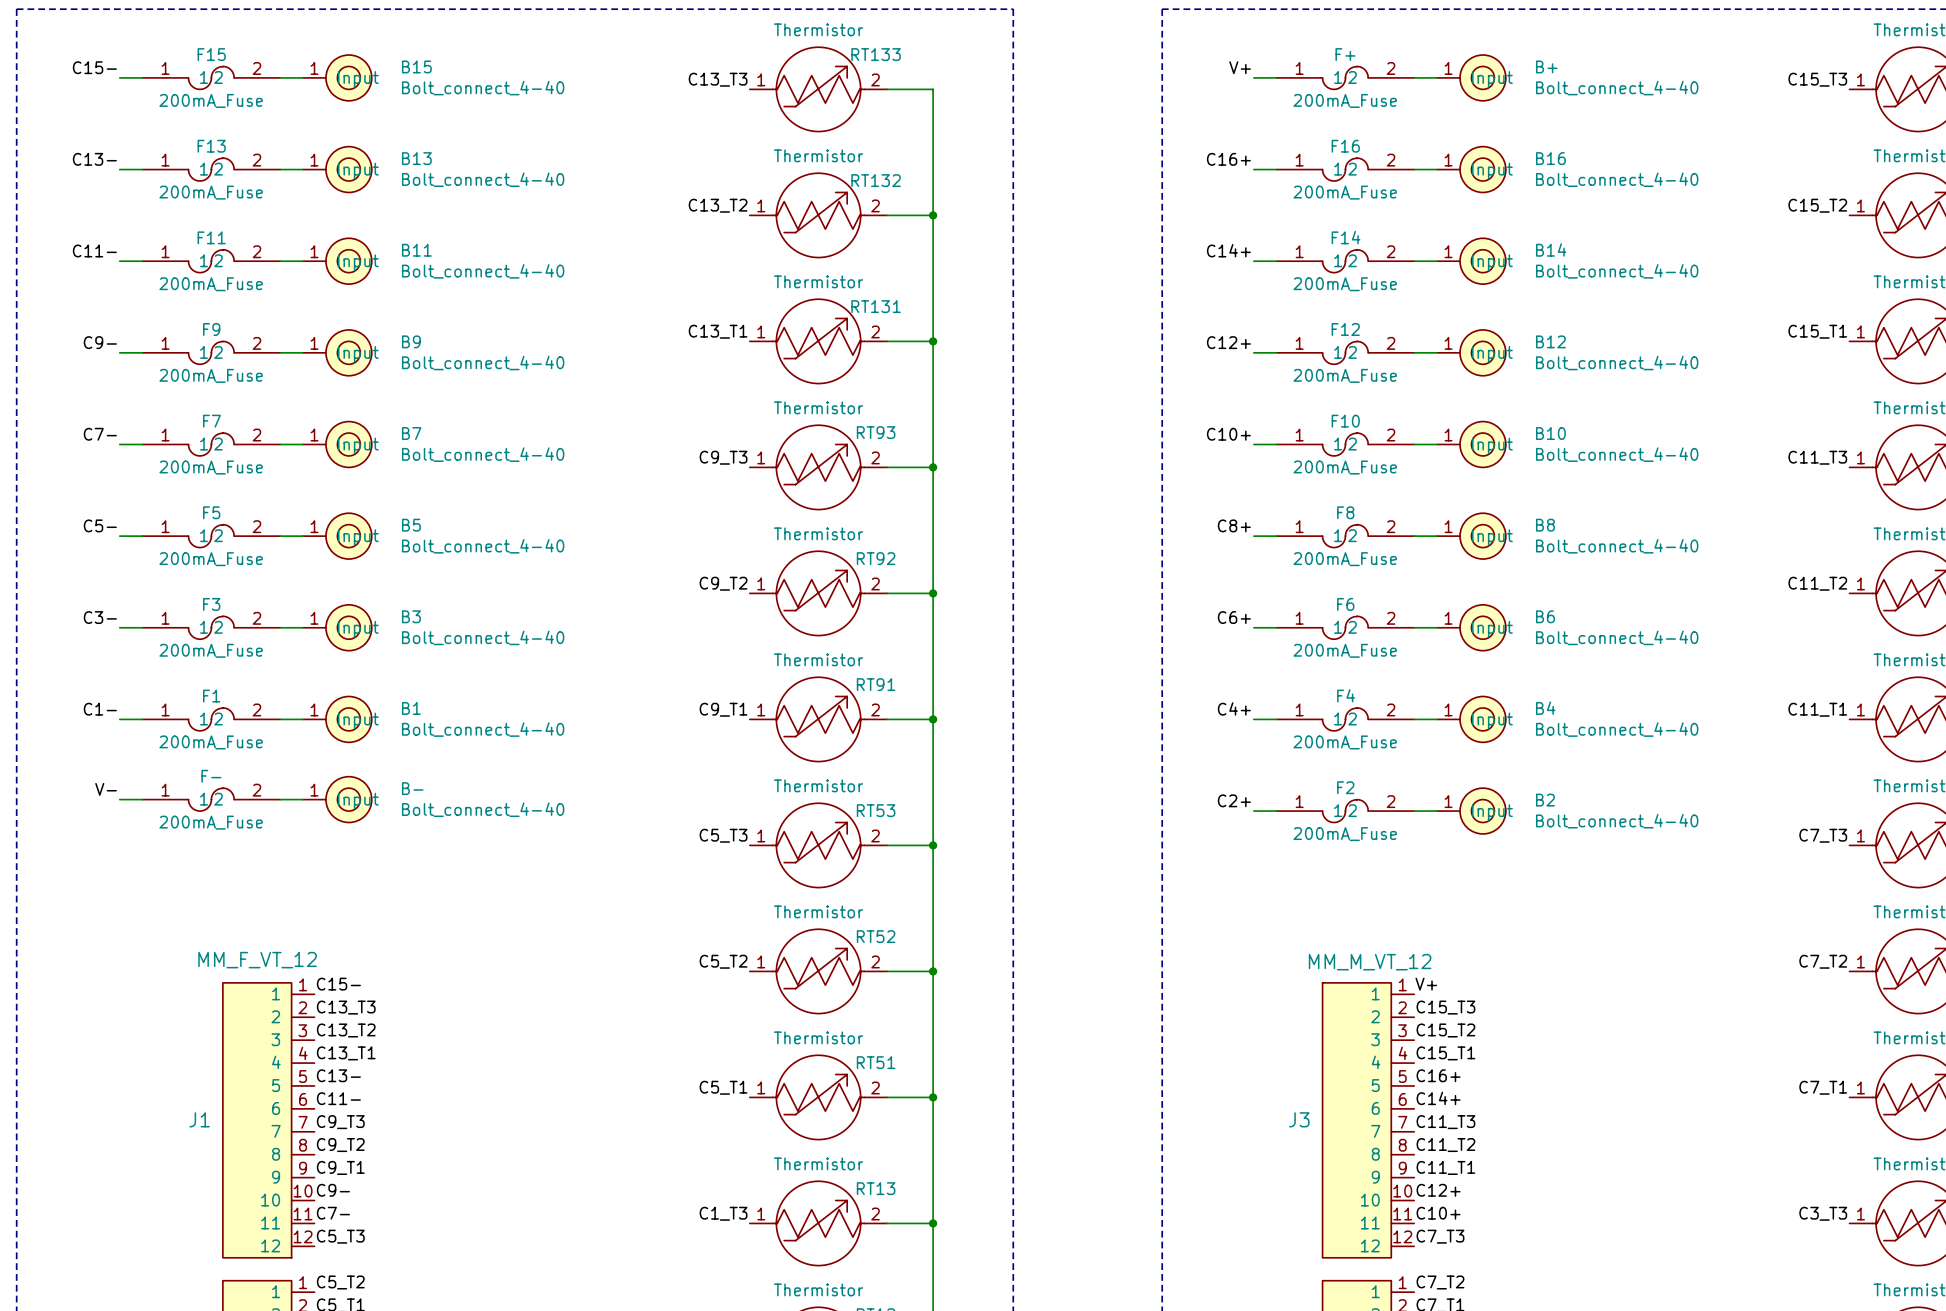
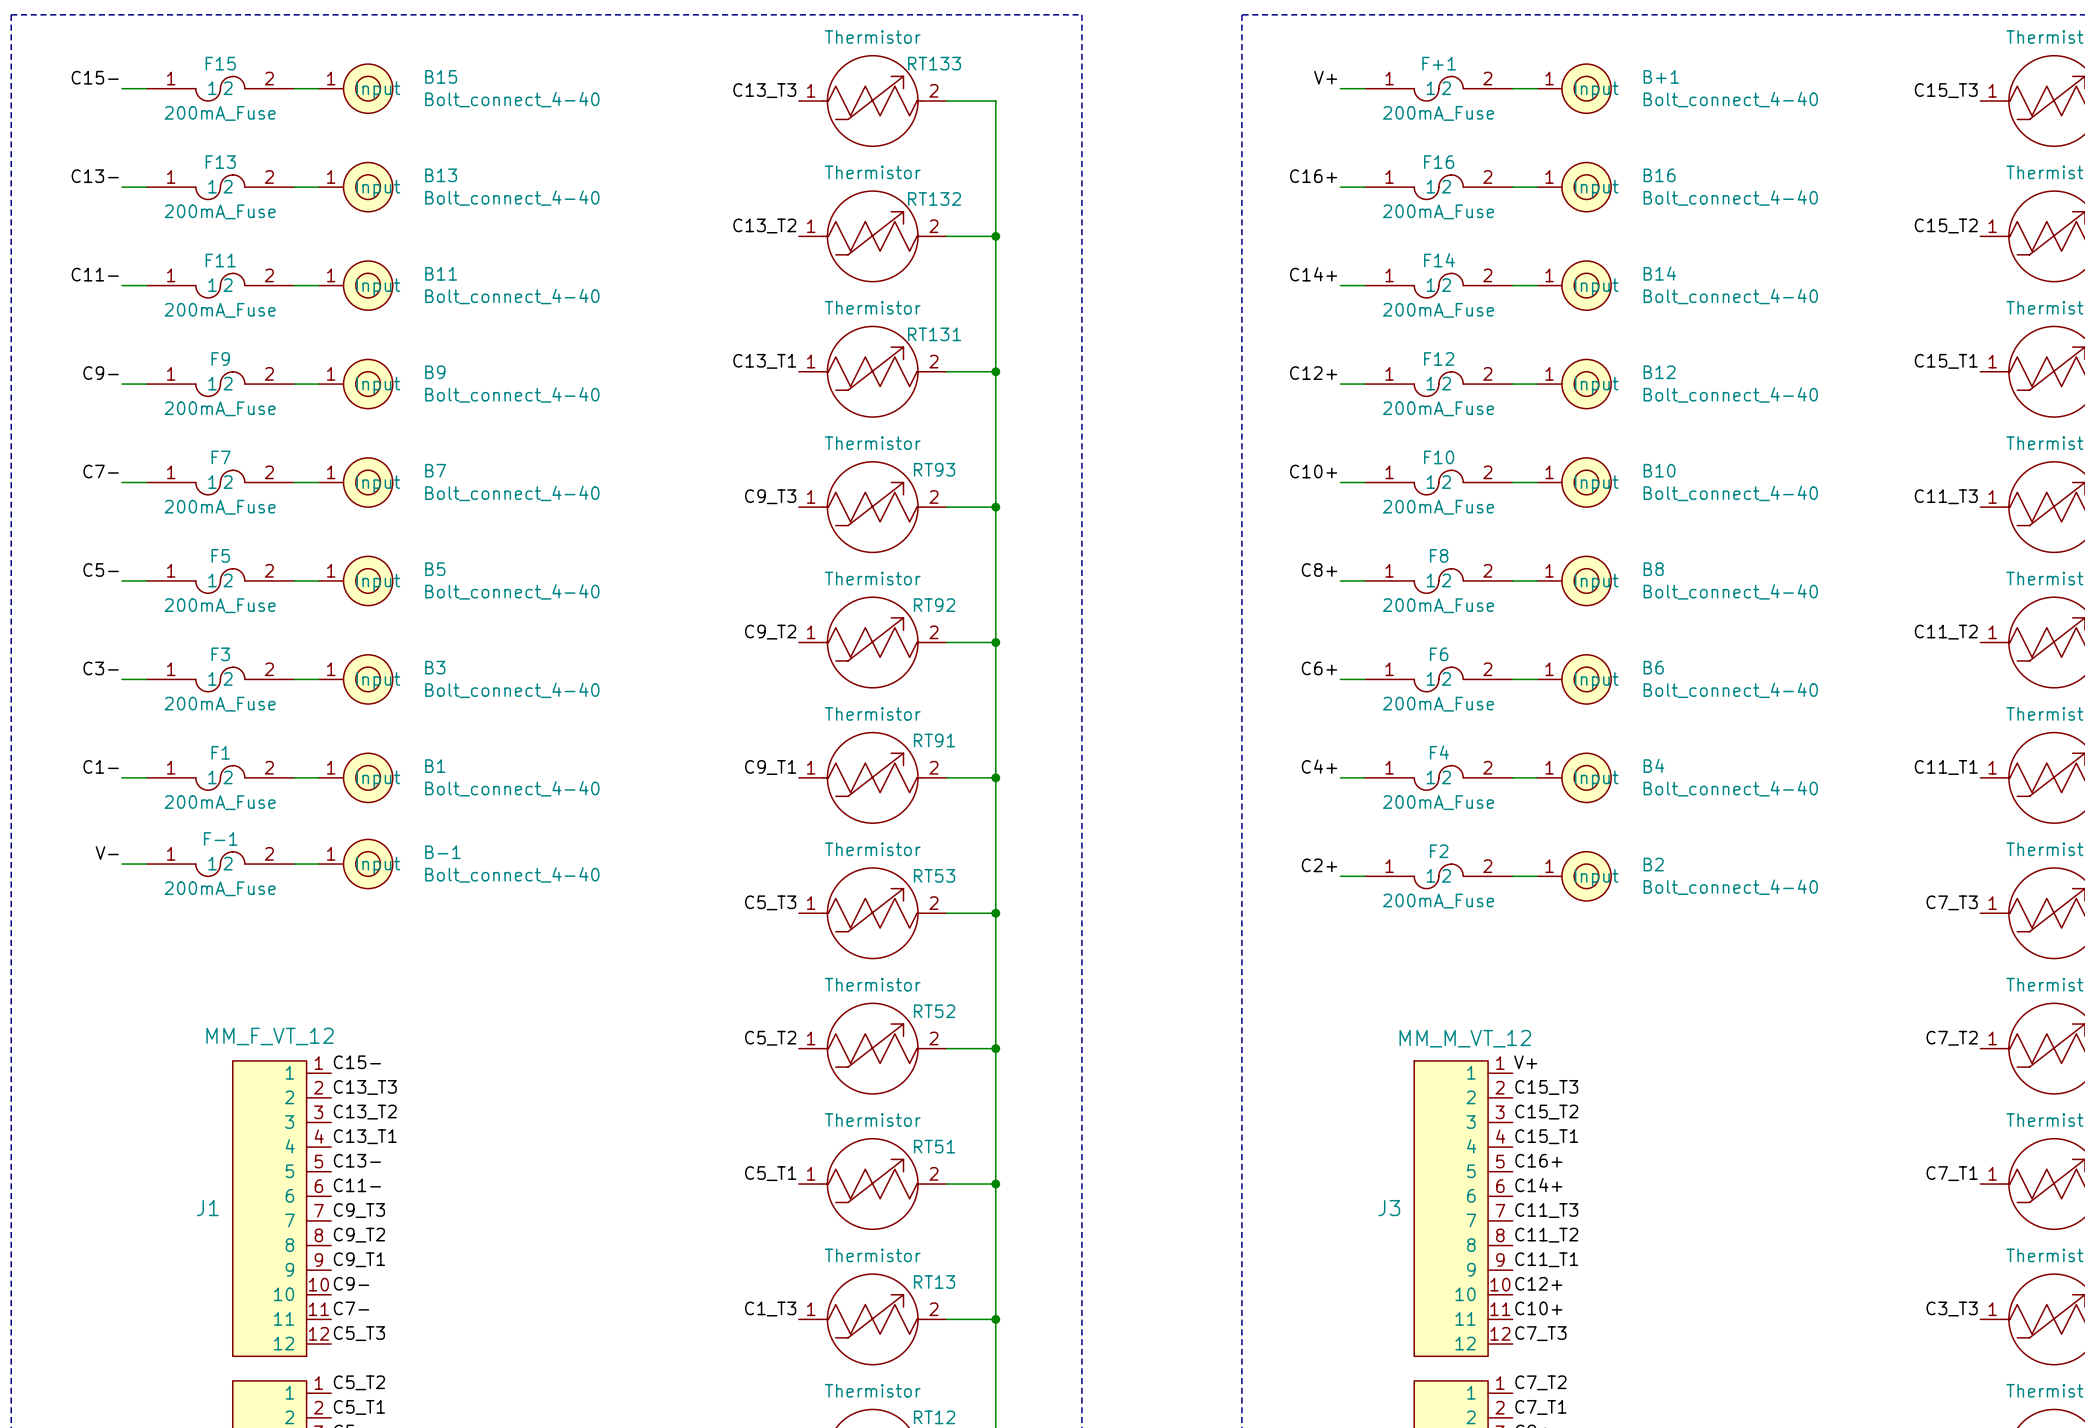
F+ name: F+ (1345, 54) -> F+1 (1439, 63)
B+ name: B+ (1546, 66) -> B+1 (1661, 76)
F- name: F- (211, 776) -> F-1 (220, 838)
B- name: B- (412, 788) -> B-1 (442, 852)

